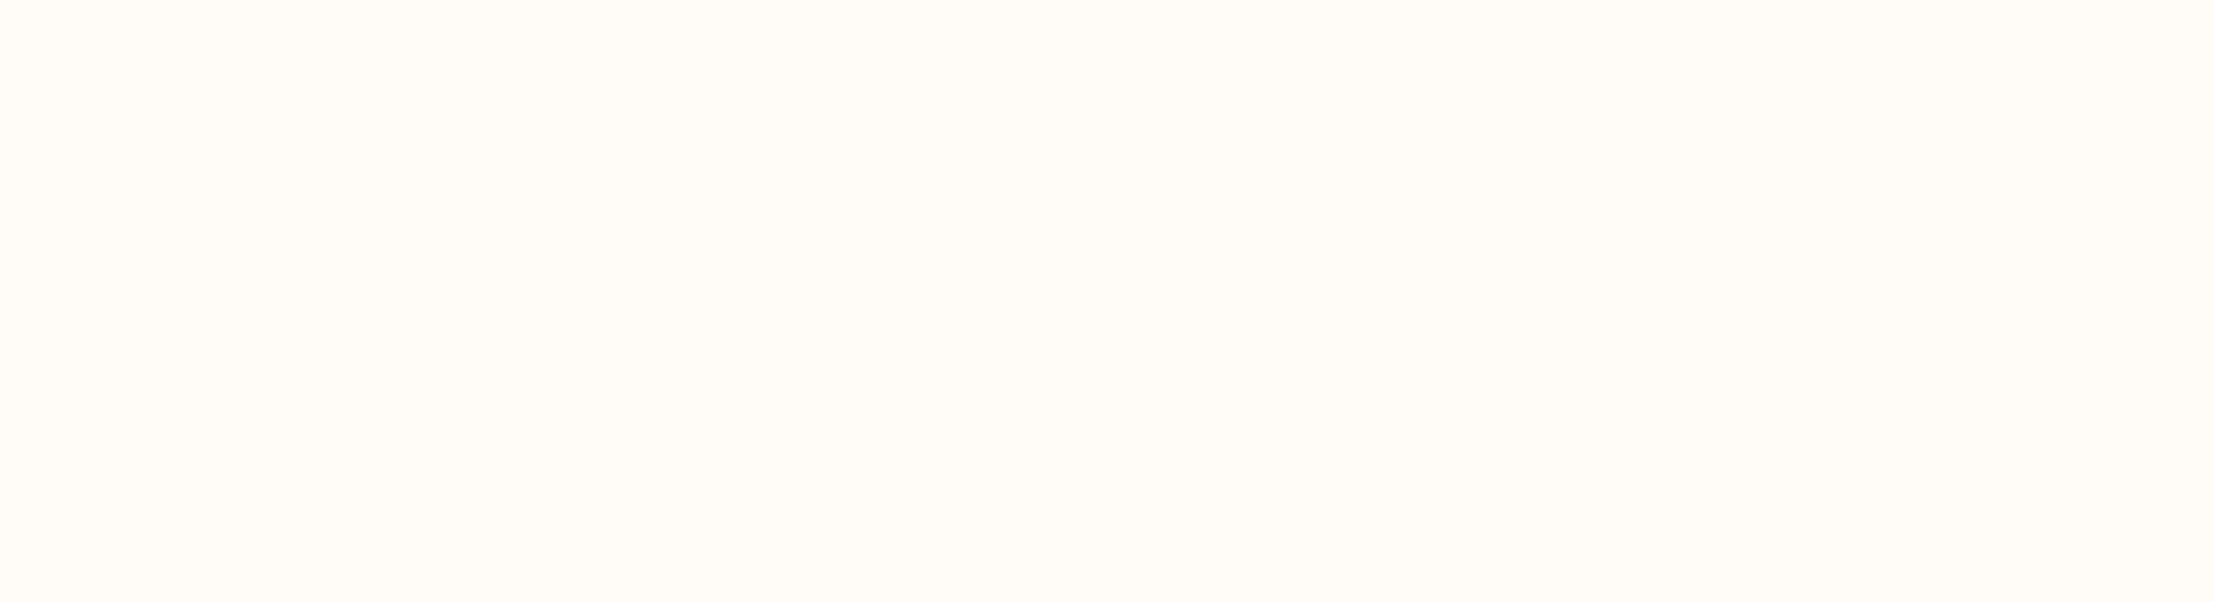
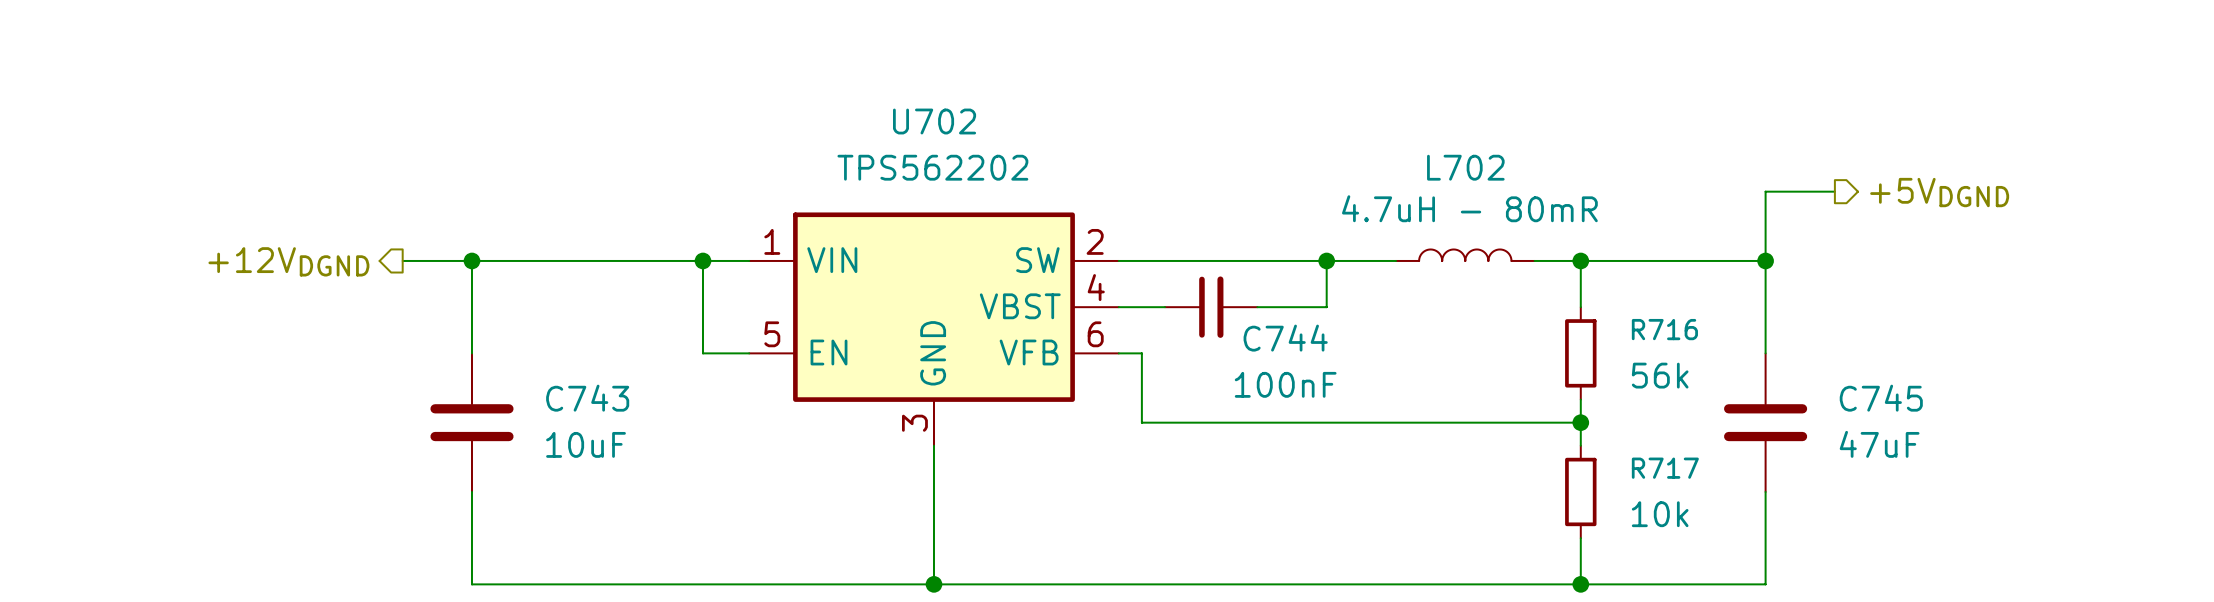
wire: none -> (1834, 191) (1765, 191) (1765, 353)
hierarchical label: none -> +5VDGND (1939, 192)
L702: none -> 4.7uH - 80mR (1465, 255)
wire: none -> (402, 260) (749, 260)
wire: none -> (471, 260) (471, 353)
junction: none -> (471, 260)
wire: none -> (702, 260) (702, 353) (749, 353)
junction: none -> (702, 260)
wire: none -> (1118, 260) (1395, 260)
wire: none -> (1326, 260) (1326, 307) (1257, 307)
junction: none -> (1326, 260)
wire: none -> (1534, 260) (1765, 260)
wire: none -> (1580, 260) (1580, 307)
junction: none -> (1580, 260)
junction: none -> (1765, 260)
hierarchical label: none -> +12VDGND (288, 261)
wire: none -> (1118, 307) (1164, 307)
C744: none -> 100nF (1211, 307)
U702: none -> TPS562202 (933, 329)
wire: none -> (1118, 353) (1141, 353) (1141, 422) (1580, 422)
R716: none -> 56k (1580, 353)
wire: none -> (1580, 399) (1580, 445)
C743: none -> 10uF (471, 422)
junction: none -> (1580, 422)
C745: none -> 47uF (1765, 422)
wire: none -> (933, 445) (933, 584)
wire: none -> (471, 491) (471, 584) (1765, 584) (1765, 491)
R717: none -> 10k (1580, 491)
wire: none -> (1580, 538) (1580, 584)
junction: none -> (933, 584)
junction: none -> (1580, 584)

